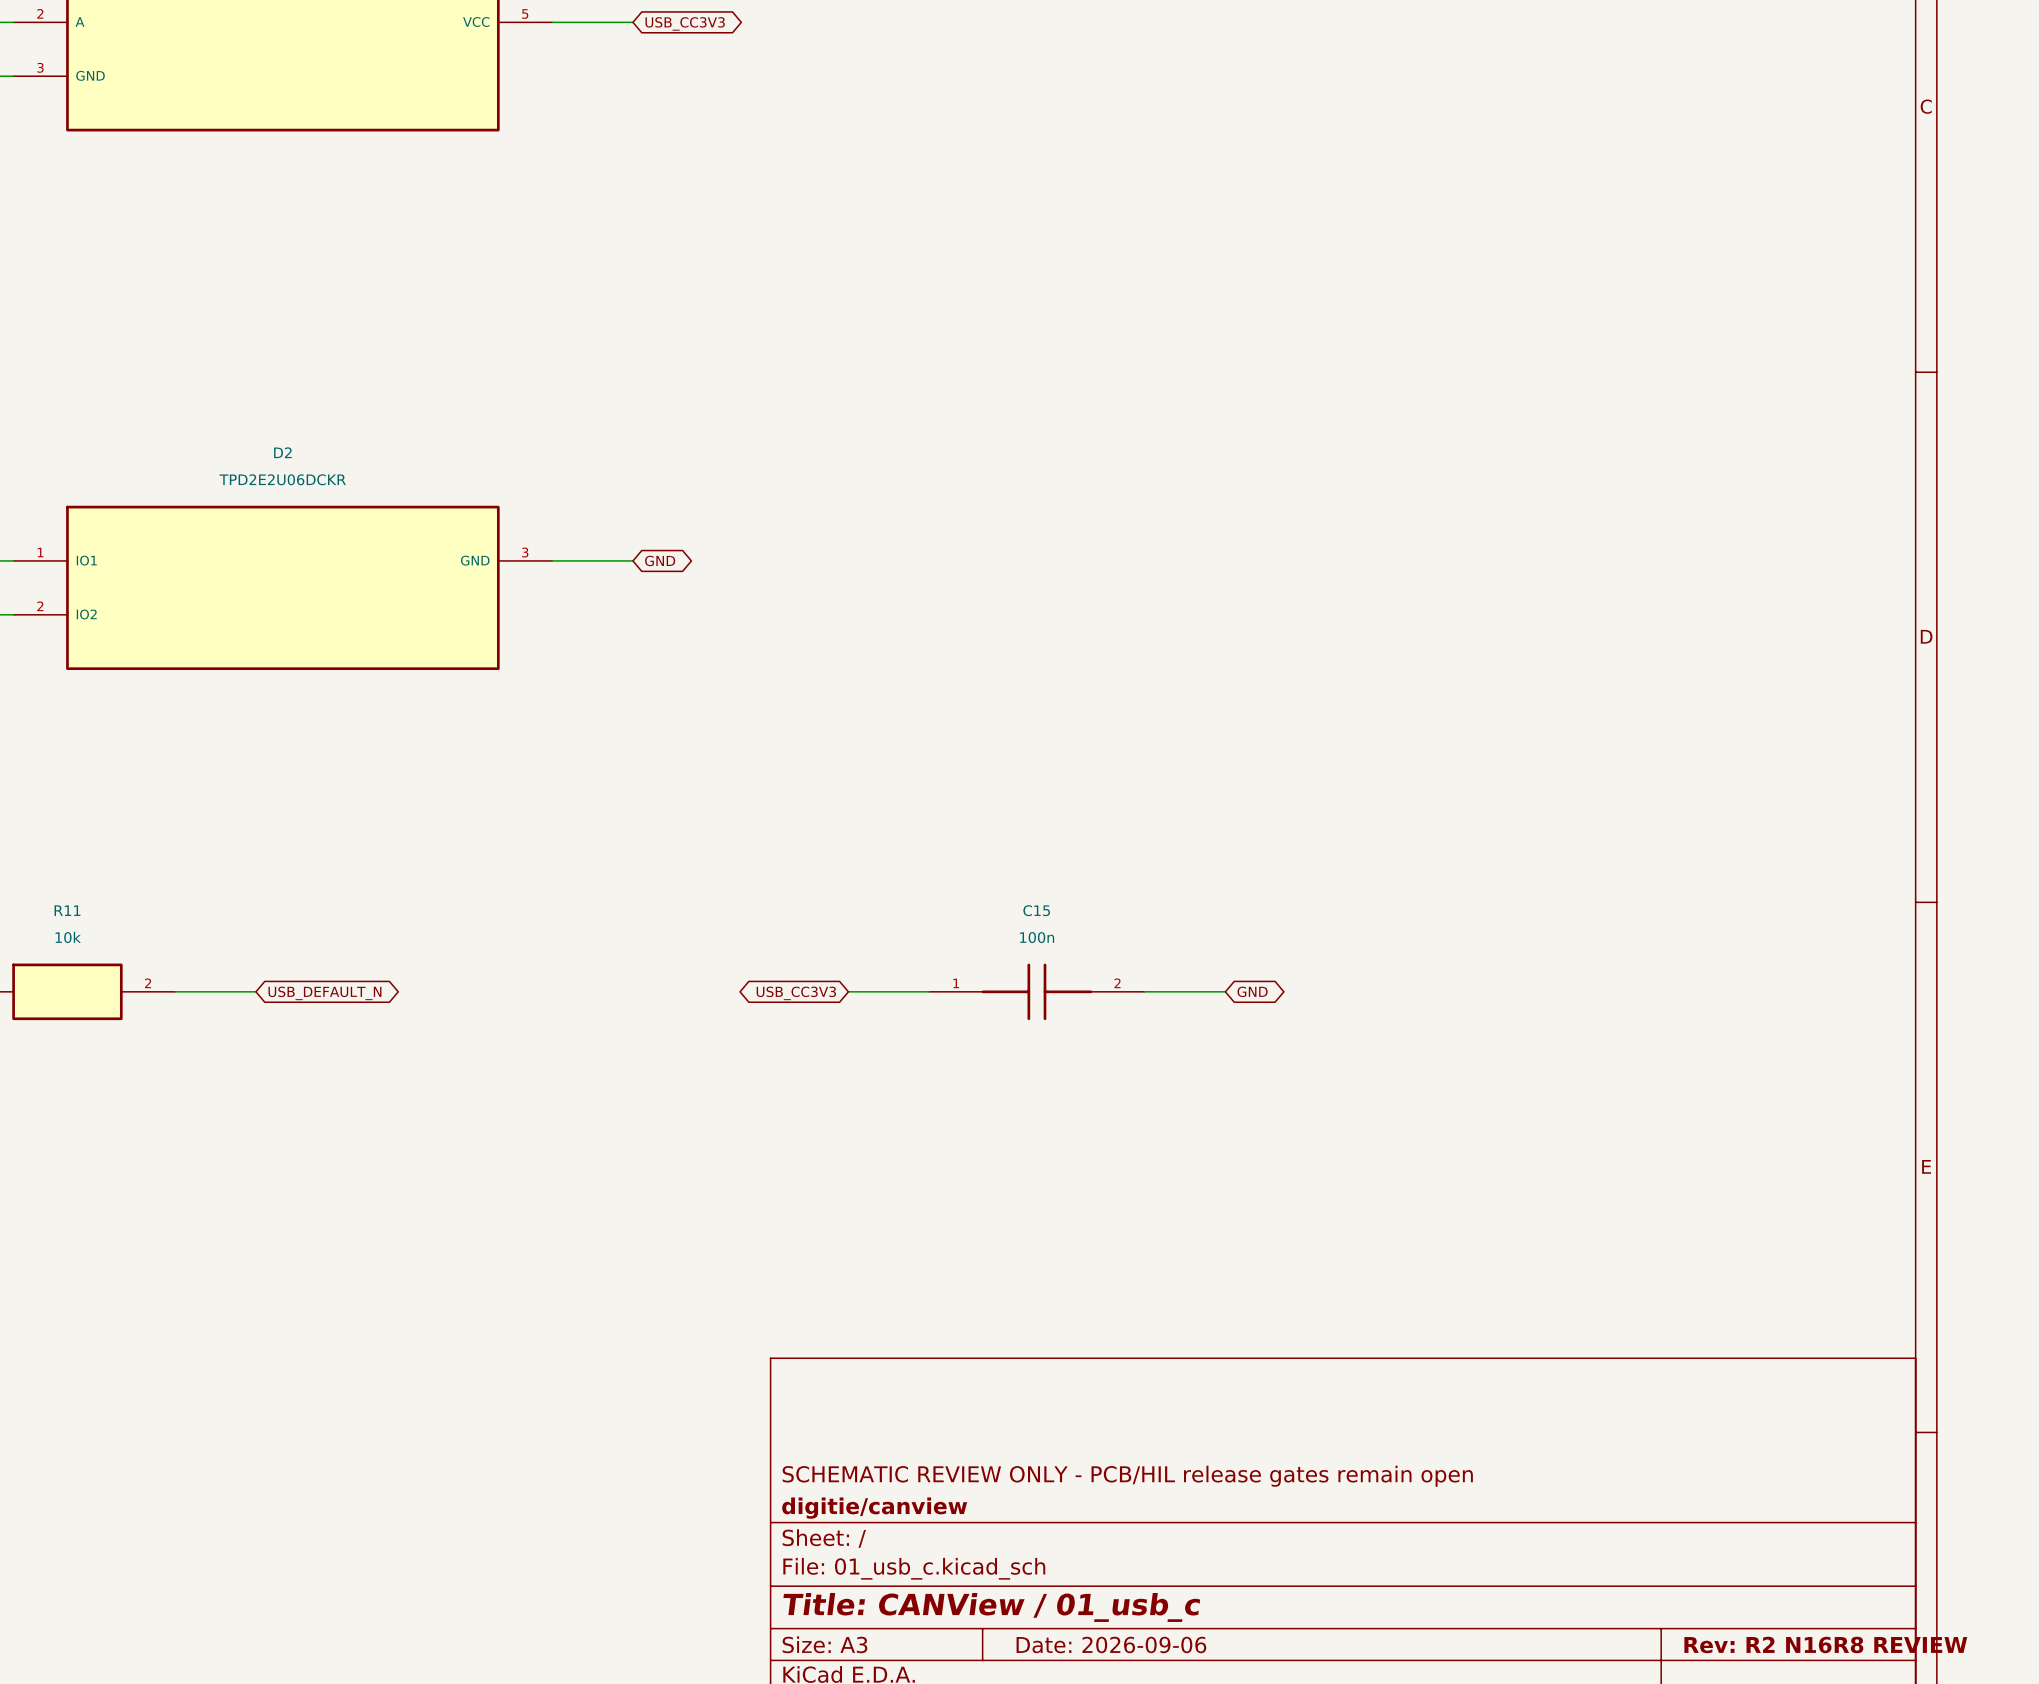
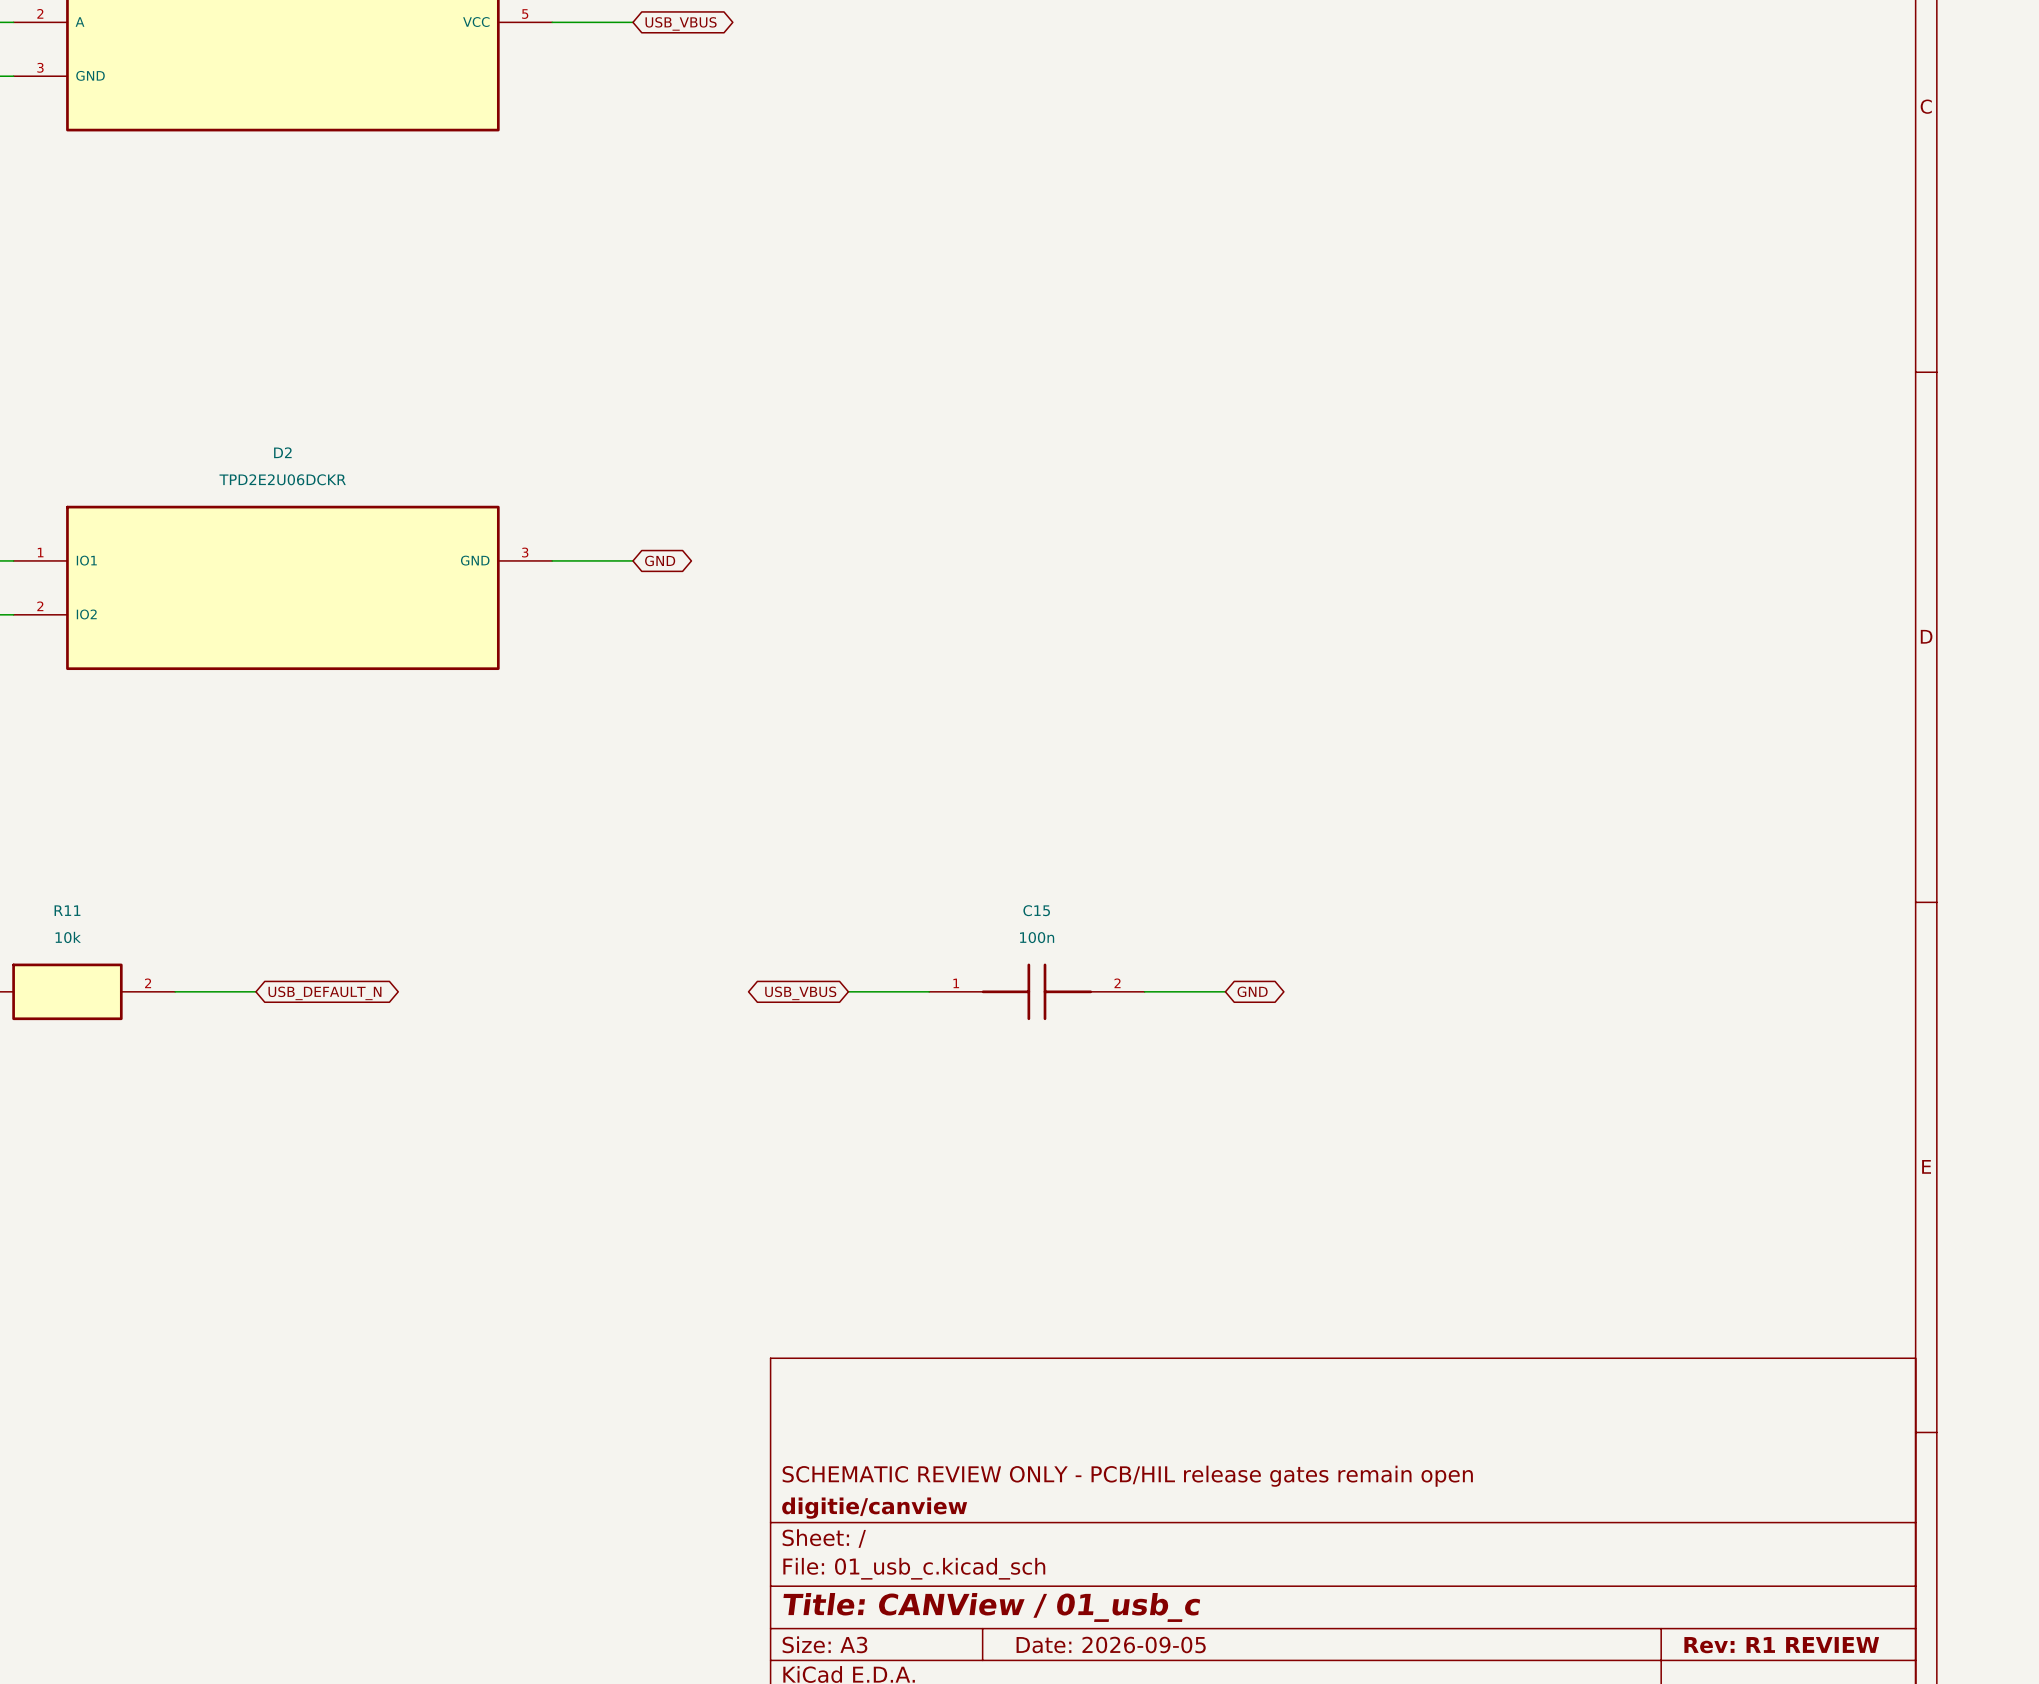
global label: USB_CC3V3 (685, 23) -> USB_VBUS (681, 23)
global label: USB_CC3V3 (796, 993) -> USB_VBUS (800, 993)
title block: Date: 2026-09-06 (1111, 1644) -> Date: 2026-09-05 (1111, 1644)
title block: Rev: R2 N16R8 REVIEW (1825, 1644) -> Rev: R1 REVIEW (1781, 1645)

